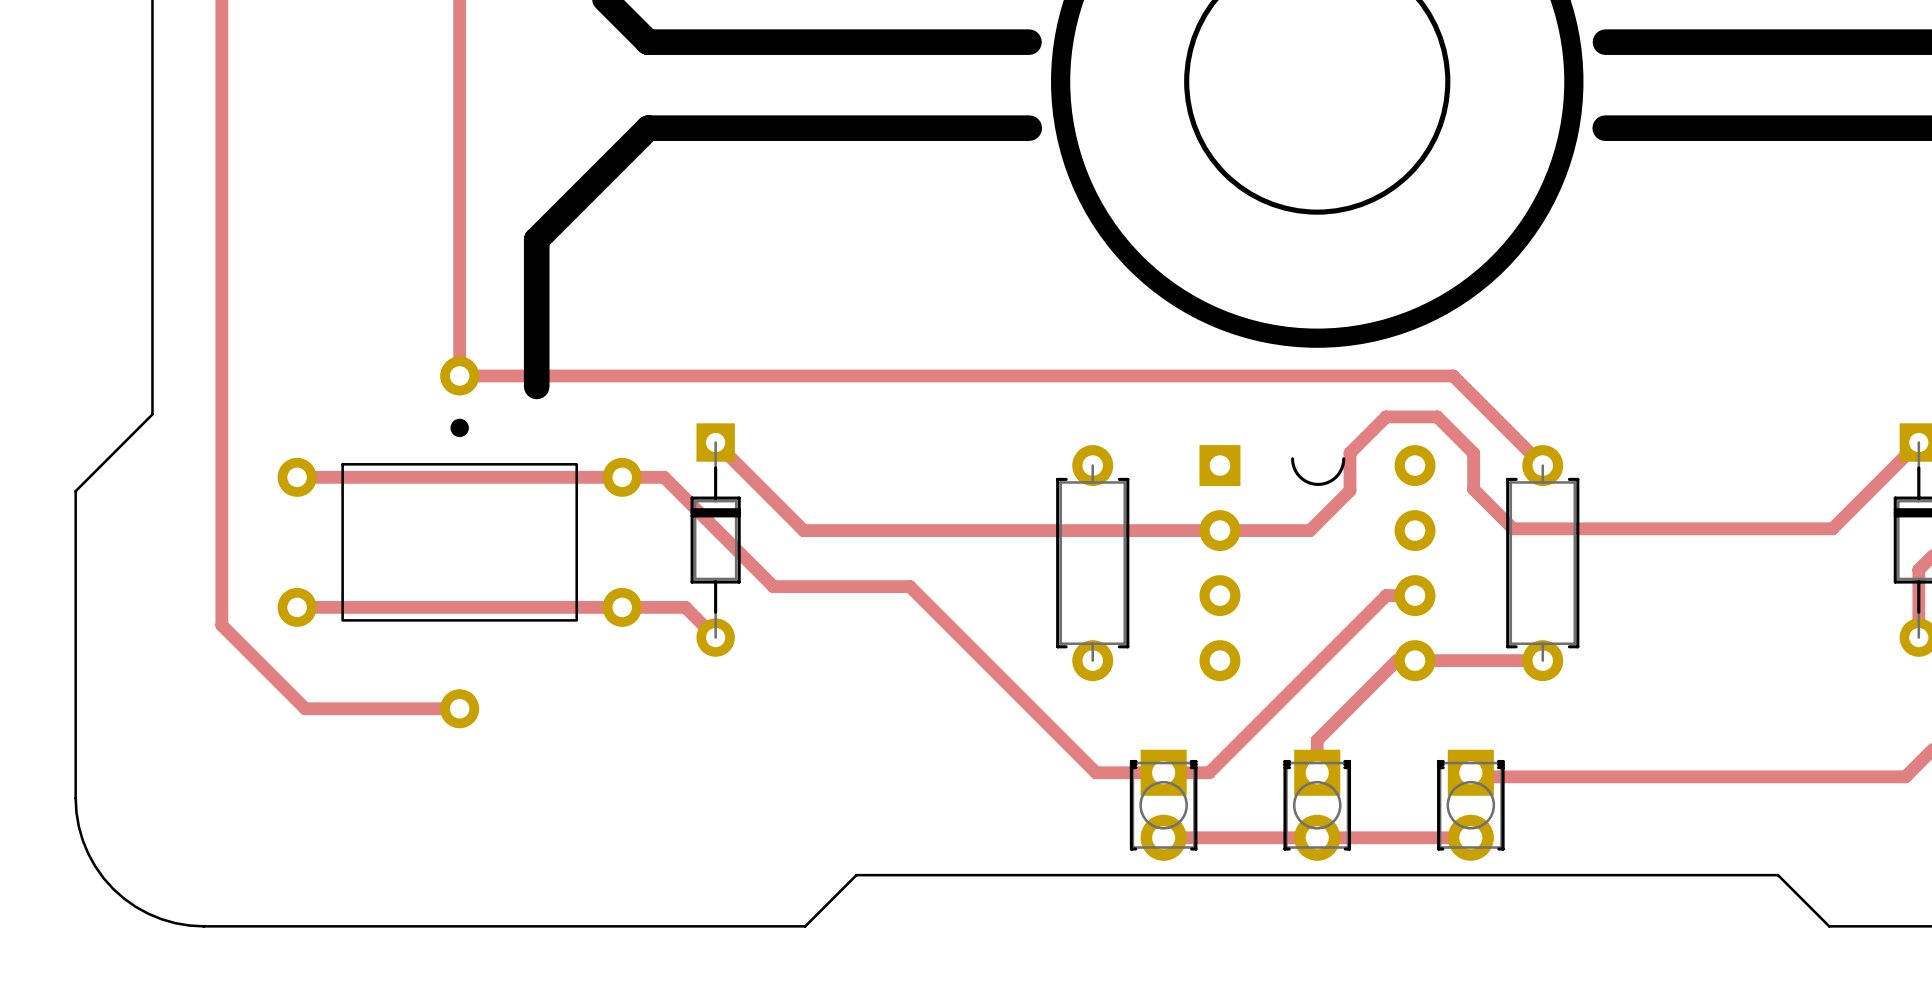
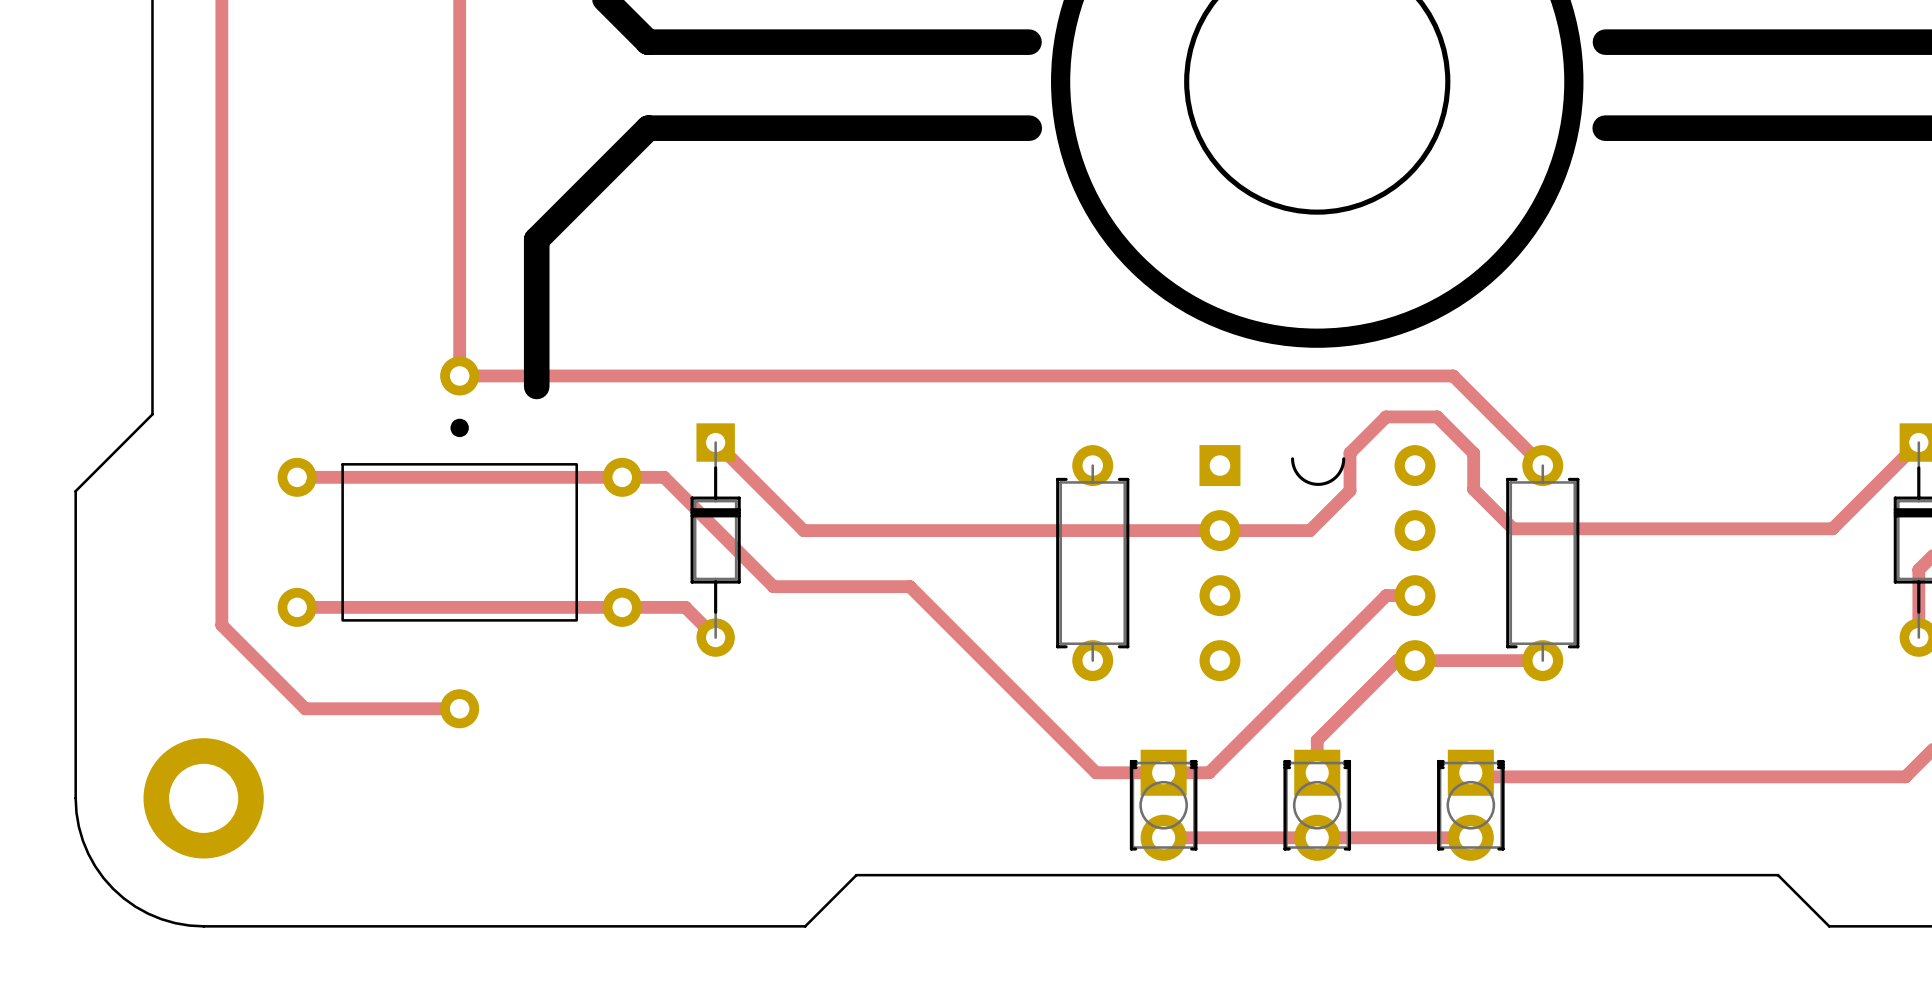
part: none -> (203, 798)

